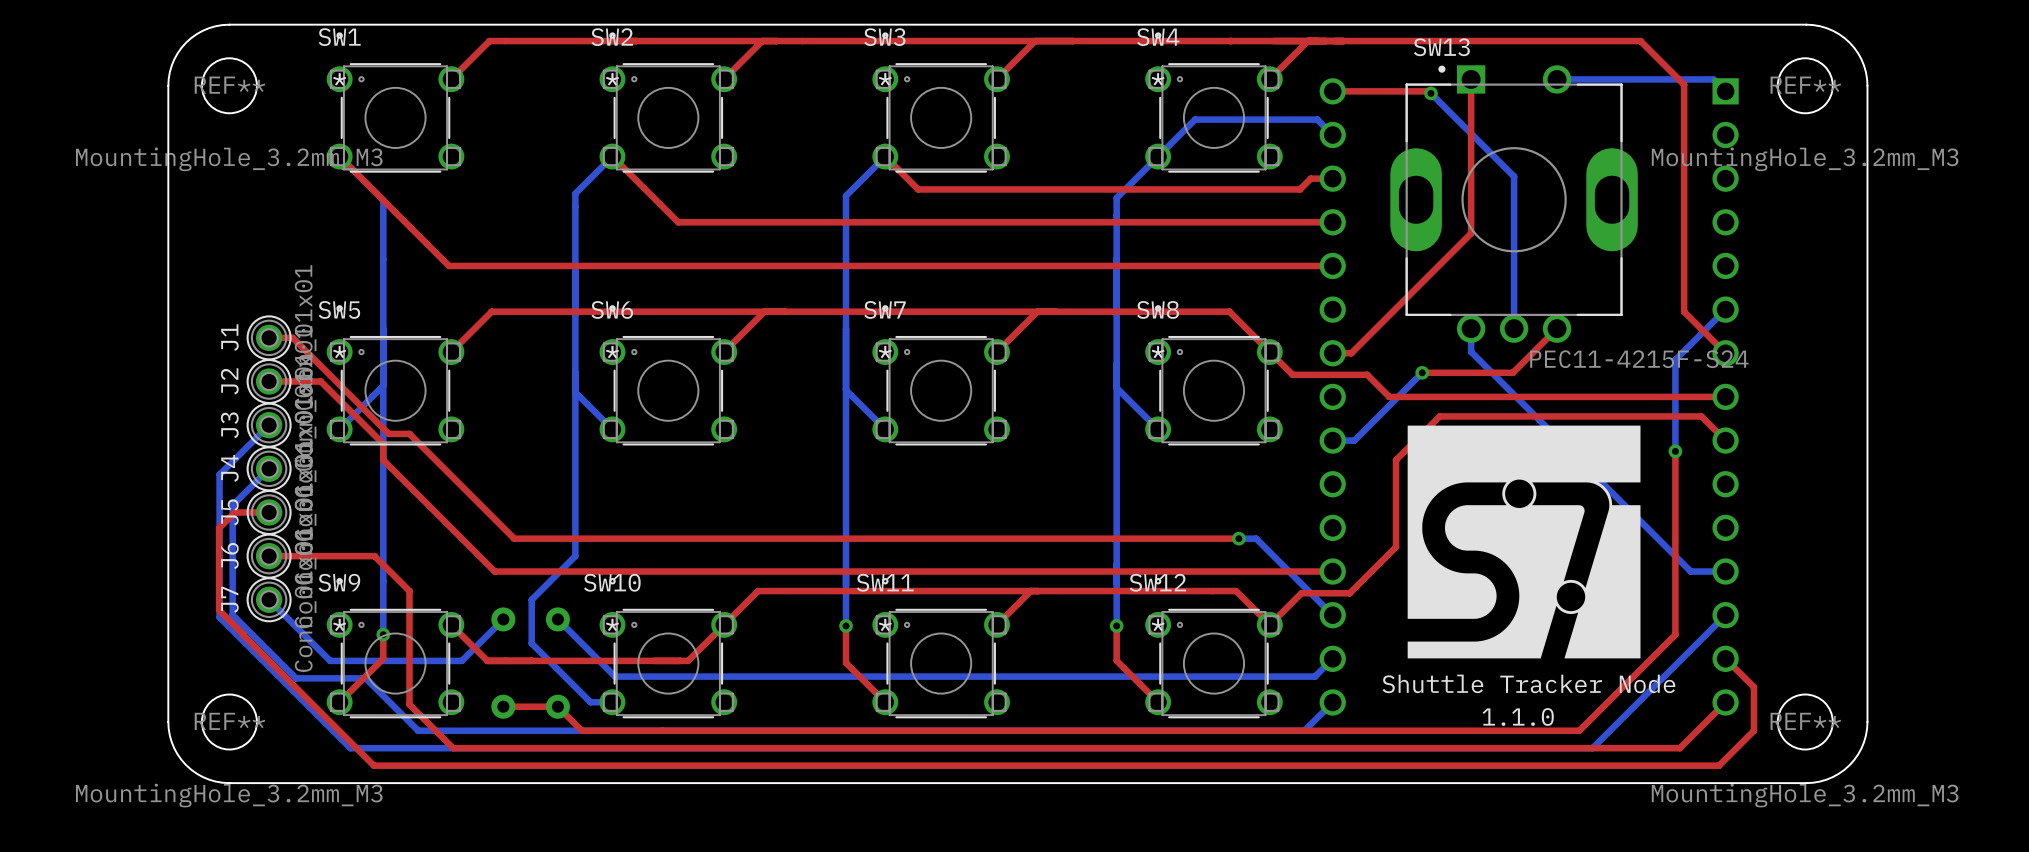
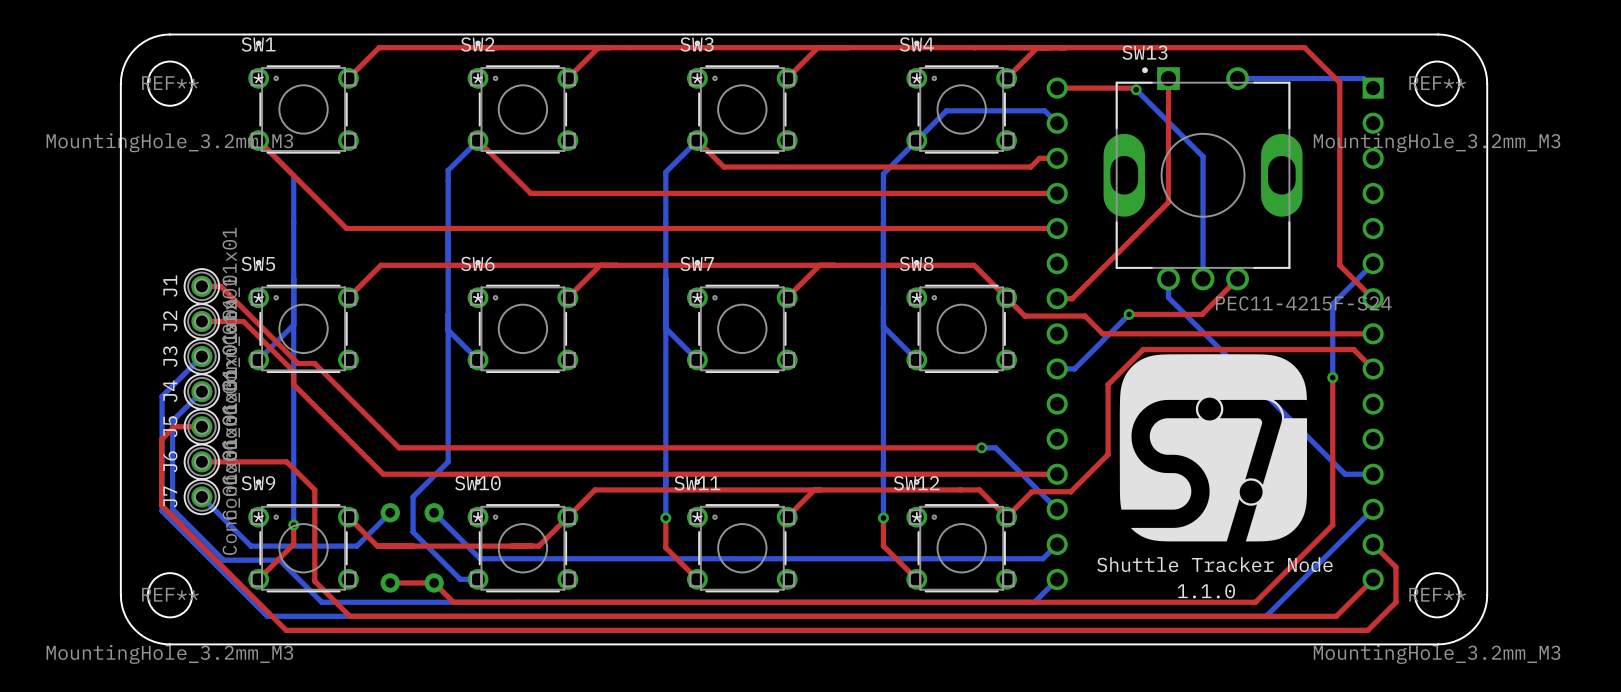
drawing shape: [1407, 425, 1641, 659] -> [1119, 354, 1308, 542]

